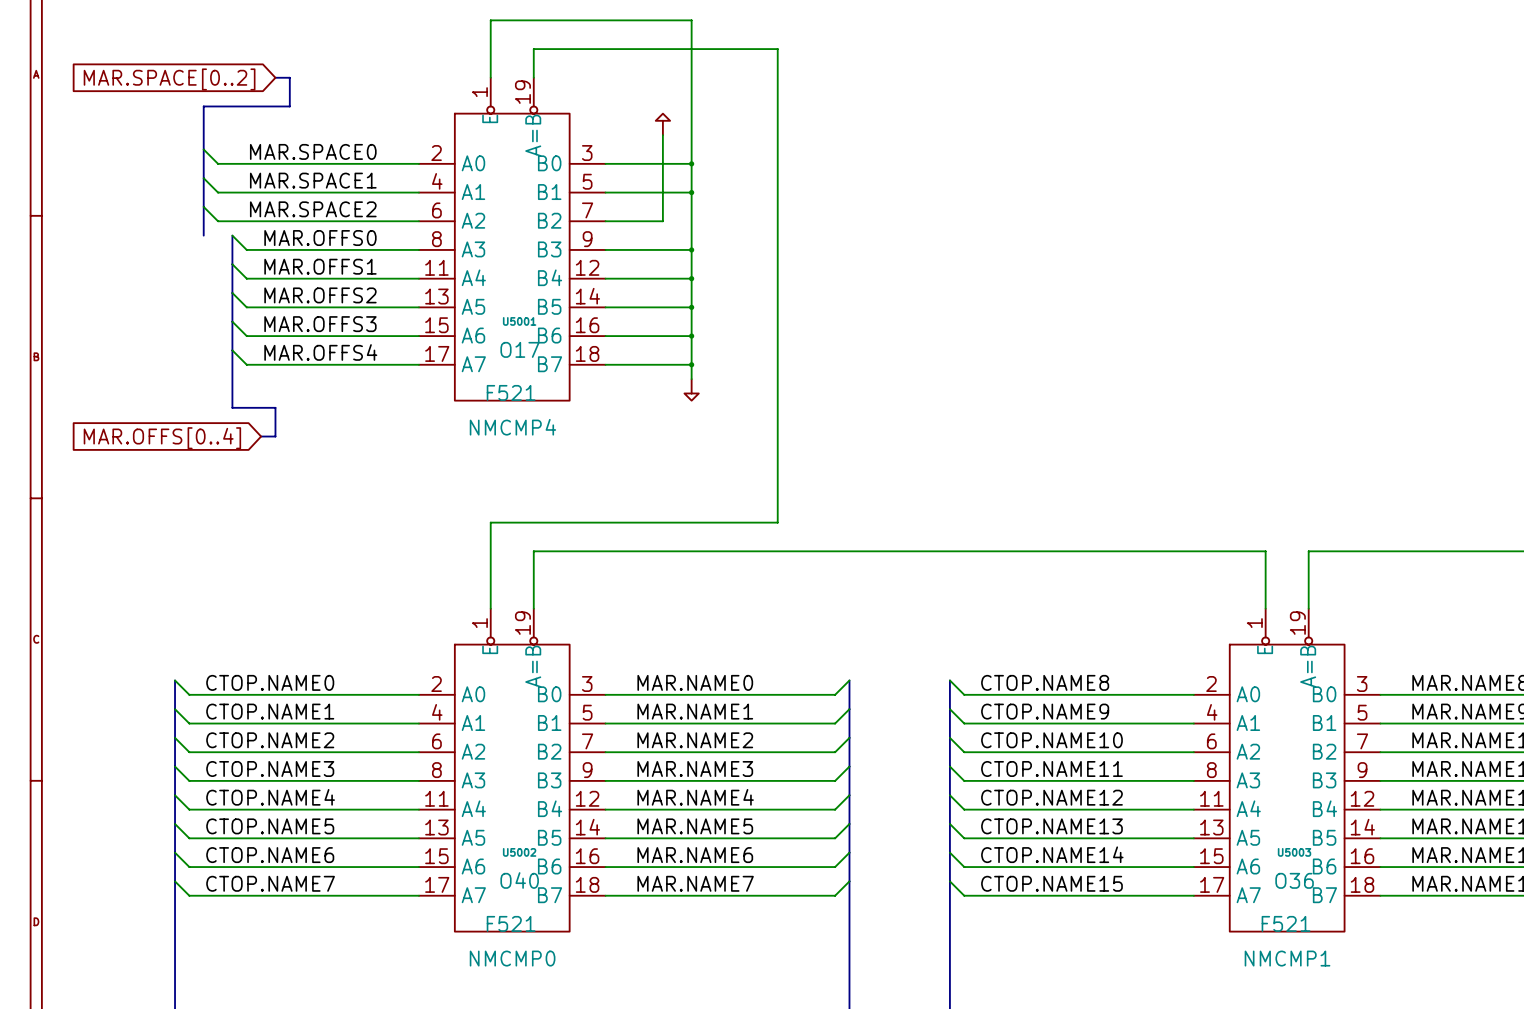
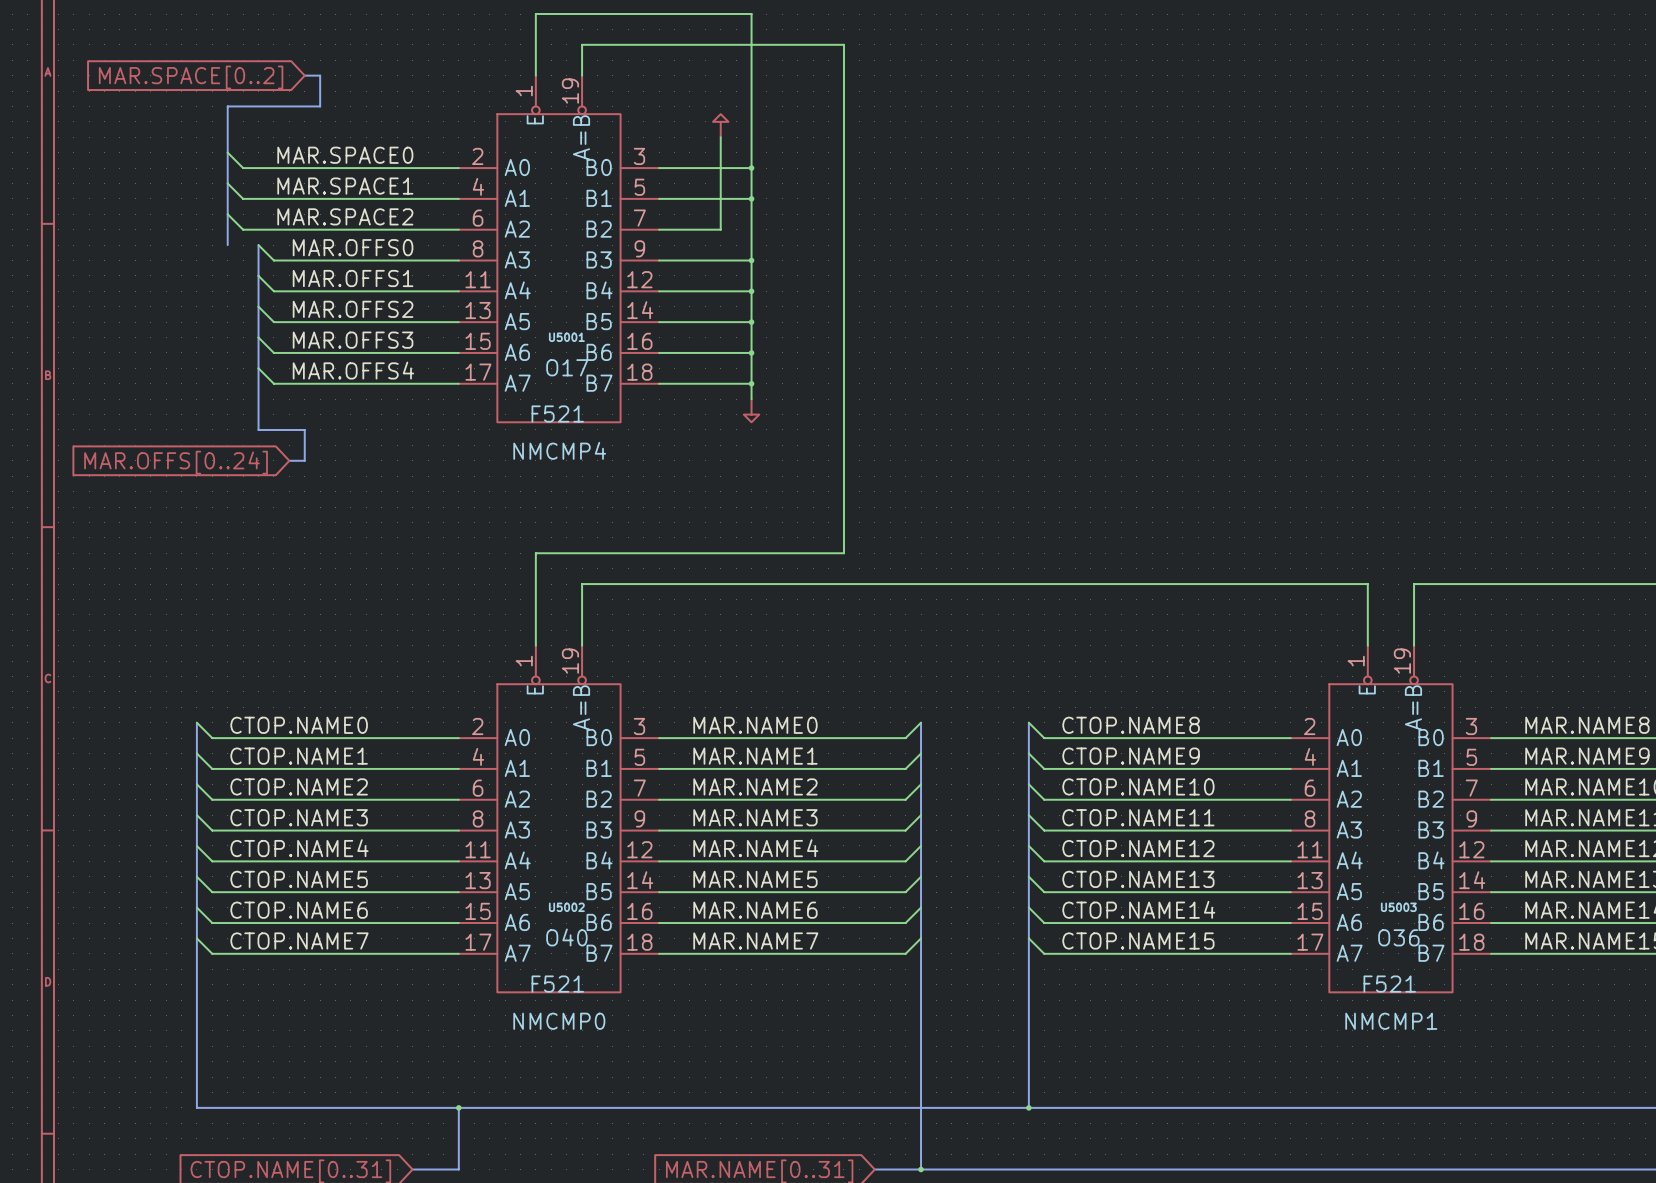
global label: MAR.OFFS[0..4] (162, 438) -> MAR.OFFS[0..24] (176, 462)

